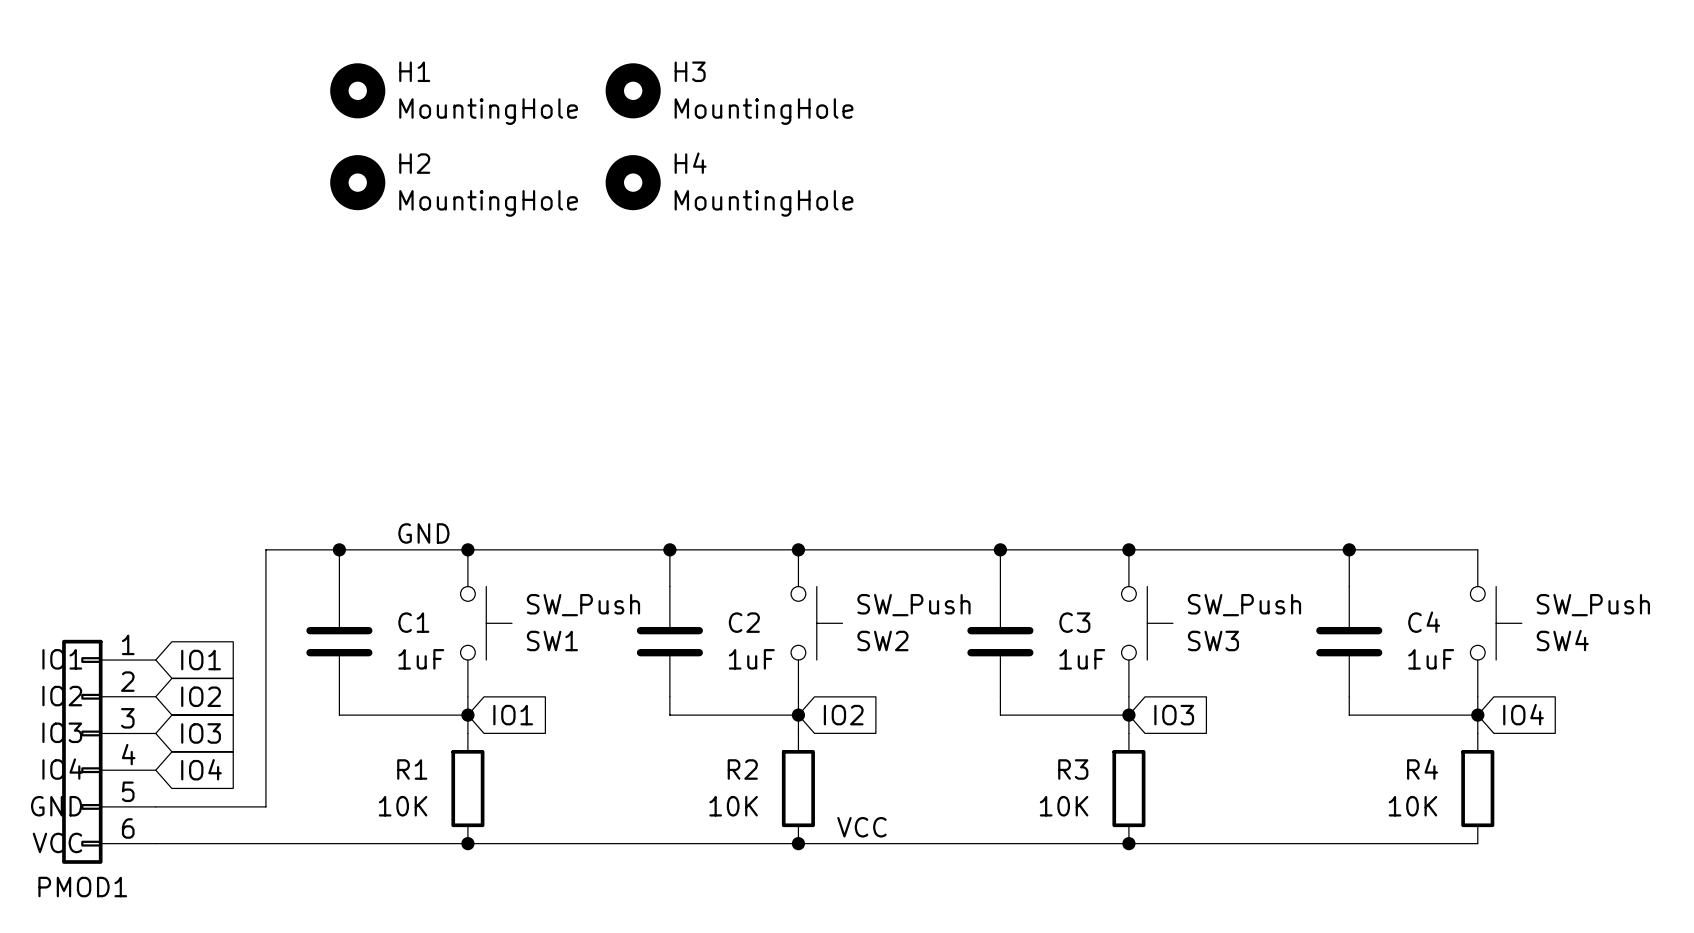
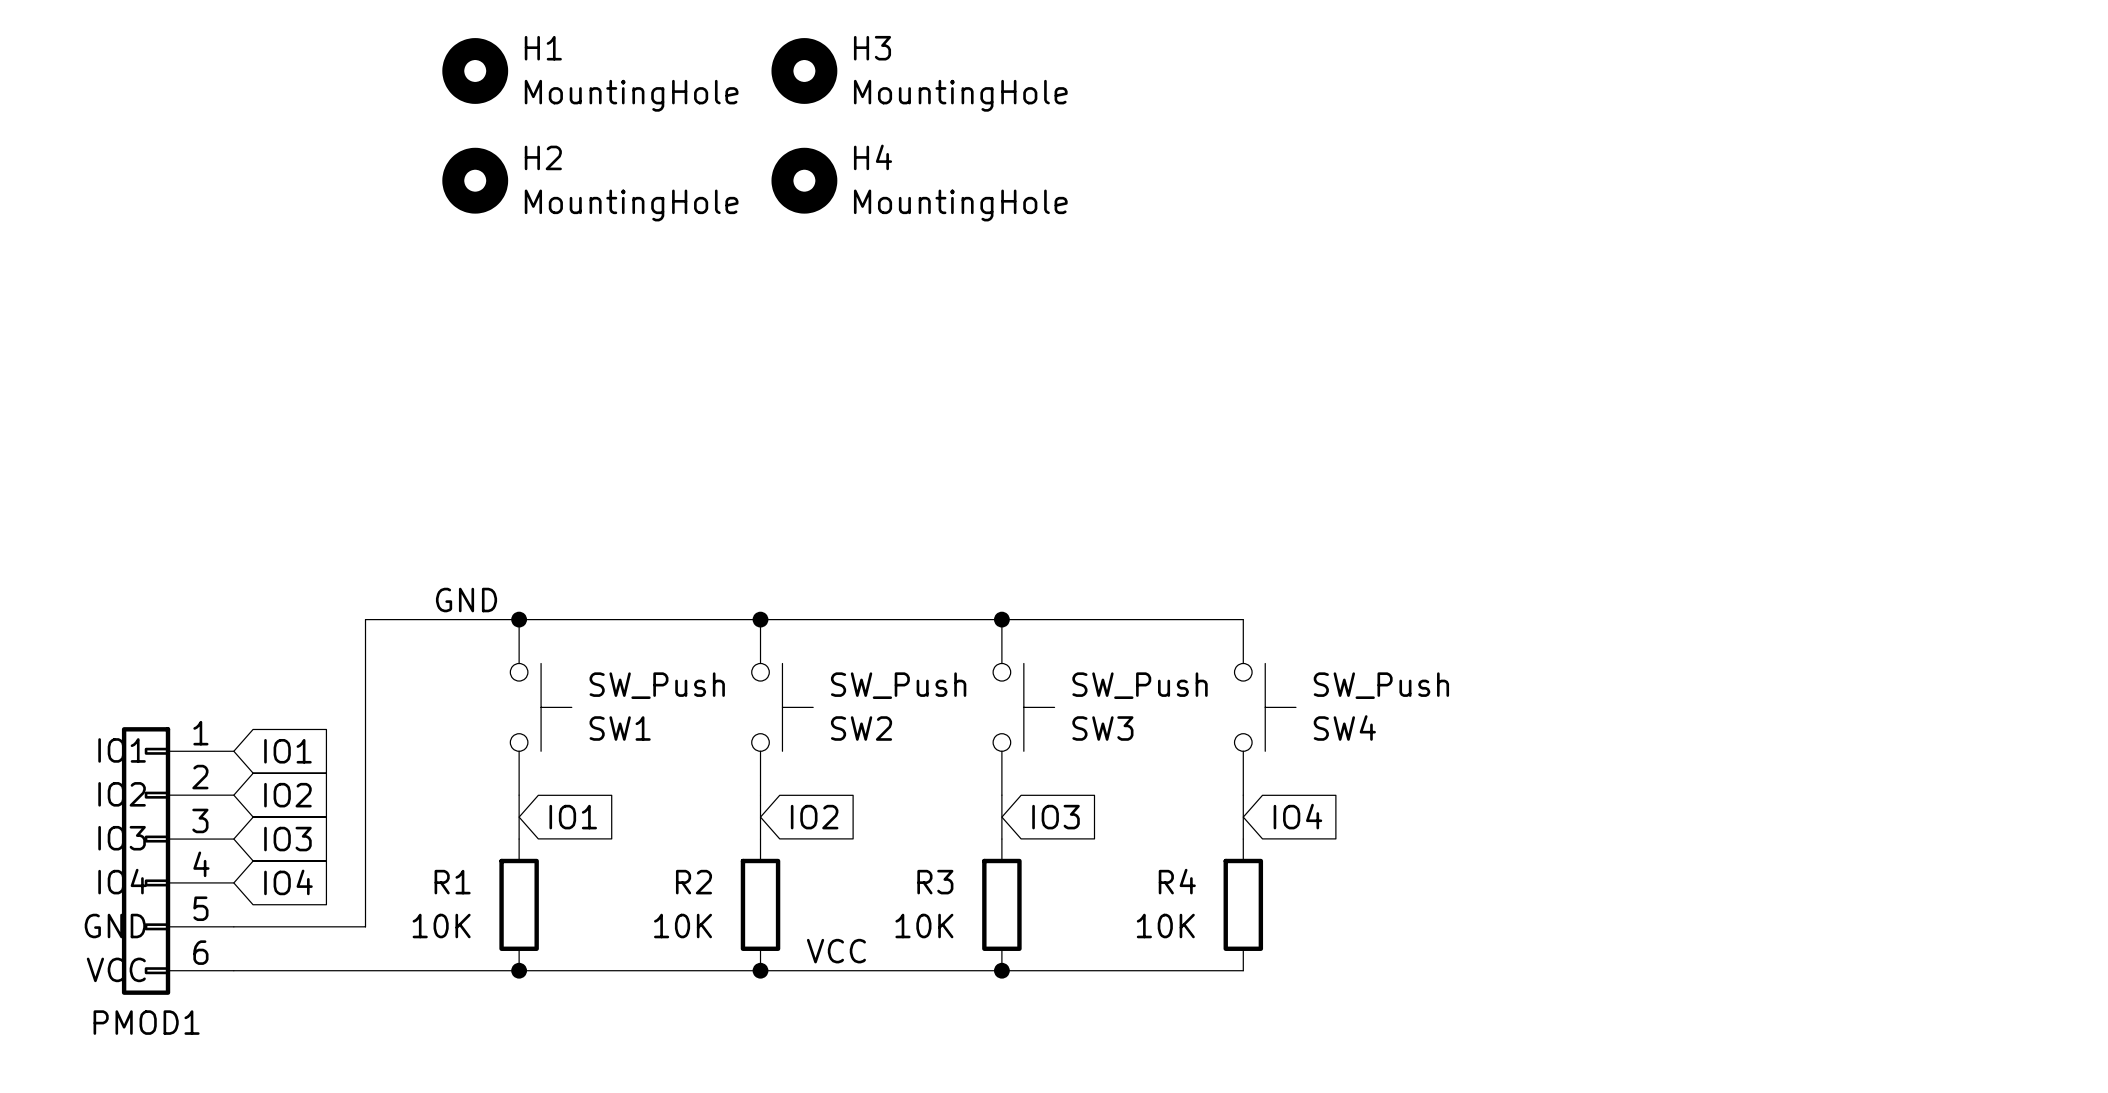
label position: GND (423, 533) -> GND (466, 600)
wire: (339, 549) (339, 586) -> none
junction: (339, 549) -> none
junction: none -> (519, 619)
junction: (467, 549) -> none
junction: none -> (760, 619)
wire: (669, 549) (669, 586) -> (760, 795) (760, 839)
junction: (669, 549) -> none
junction: (1000, 549) -> none
junction: (1128, 549) -> none
wire: (1349, 549) (1349, 586) -> none
junction: (1349, 549) -> none
wire: (1477, 549) (1000, 549) (1000, 586) -> none
SW1 position: (486, 623) -> (541, 707)
SW2: none -> SW_Push (782, 707)
SW3: SW_Push (1147, 623) -> none
SW4 position: (1496, 623) -> (1265, 707)
SW2 name: SW2 (882, 640) -> SW3 (1102, 728)
C1: 1uF (339, 641) -> none
C2: 1uF (669, 641) -> none
C3: 1uF (1000, 641) -> none
C4: 1uF (1349, 641) -> none
wire: (339, 696) (339, 715) (467, 715) -> none
wire: (467, 696) (467, 733) -> (519, 795) (519, 839)
wire: (669, 696) (669, 715) (798, 715) -> none
wire: (1128, 696) (1128, 733) -> none
wire: (1349, 696) (1349, 715) (1477, 715) -> none
wire: (1477, 696) (1477, 733) -> none
global label: none -> IO4 (1297, 816)
global label: IO4 (1523, 714) -> none
junction: (467, 715) -> none
global label position: IO1 (513, 715) -> IO1 (573, 817)
global label: none -> IO2 (814, 817)
junction: (798, 715) -> none
global label: IO2 (843, 715) -> IO3 (1056, 817)
wire: (1000, 715) (1128, 715) -> (1243, 817) (1243, 839)
junction: (1128, 715) -> none
global label: IO3 (1174, 715) -> none
junction: (1477, 715) -> none
R2 name: R2 (742, 769) -> R3 (935, 882)
R1 position: (467, 788) -> (519, 904)
R2: none -> 10K (760, 904)
R3: 10K (1128, 788) -> none
R4 position: (1477, 788) -> (1243, 904)
label position: VCC (861, 827) -> VCC (836, 951)
junction: none -> (519, 970)
junction: (467, 843) -> none
junction: none -> (760, 970)
wire: (1000, 843) (1477, 843) -> none
junction: (1128, 843) -> none

